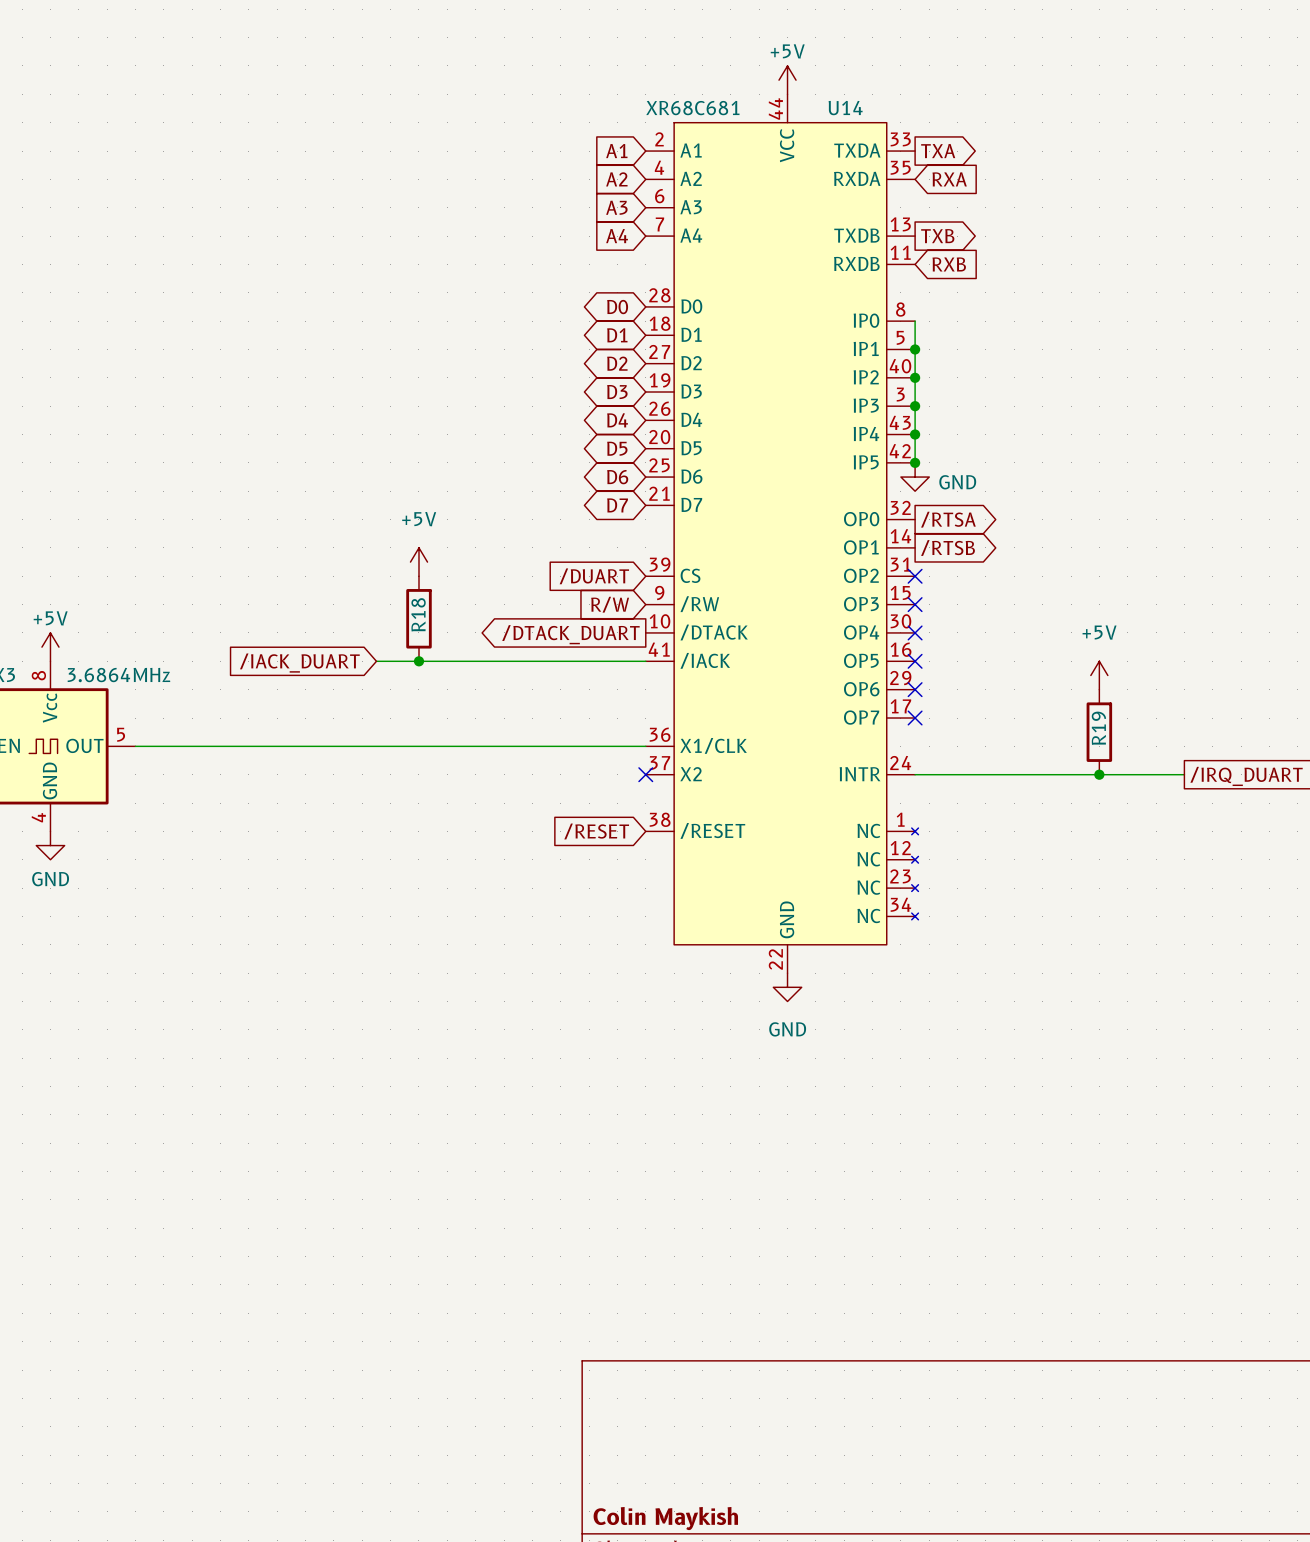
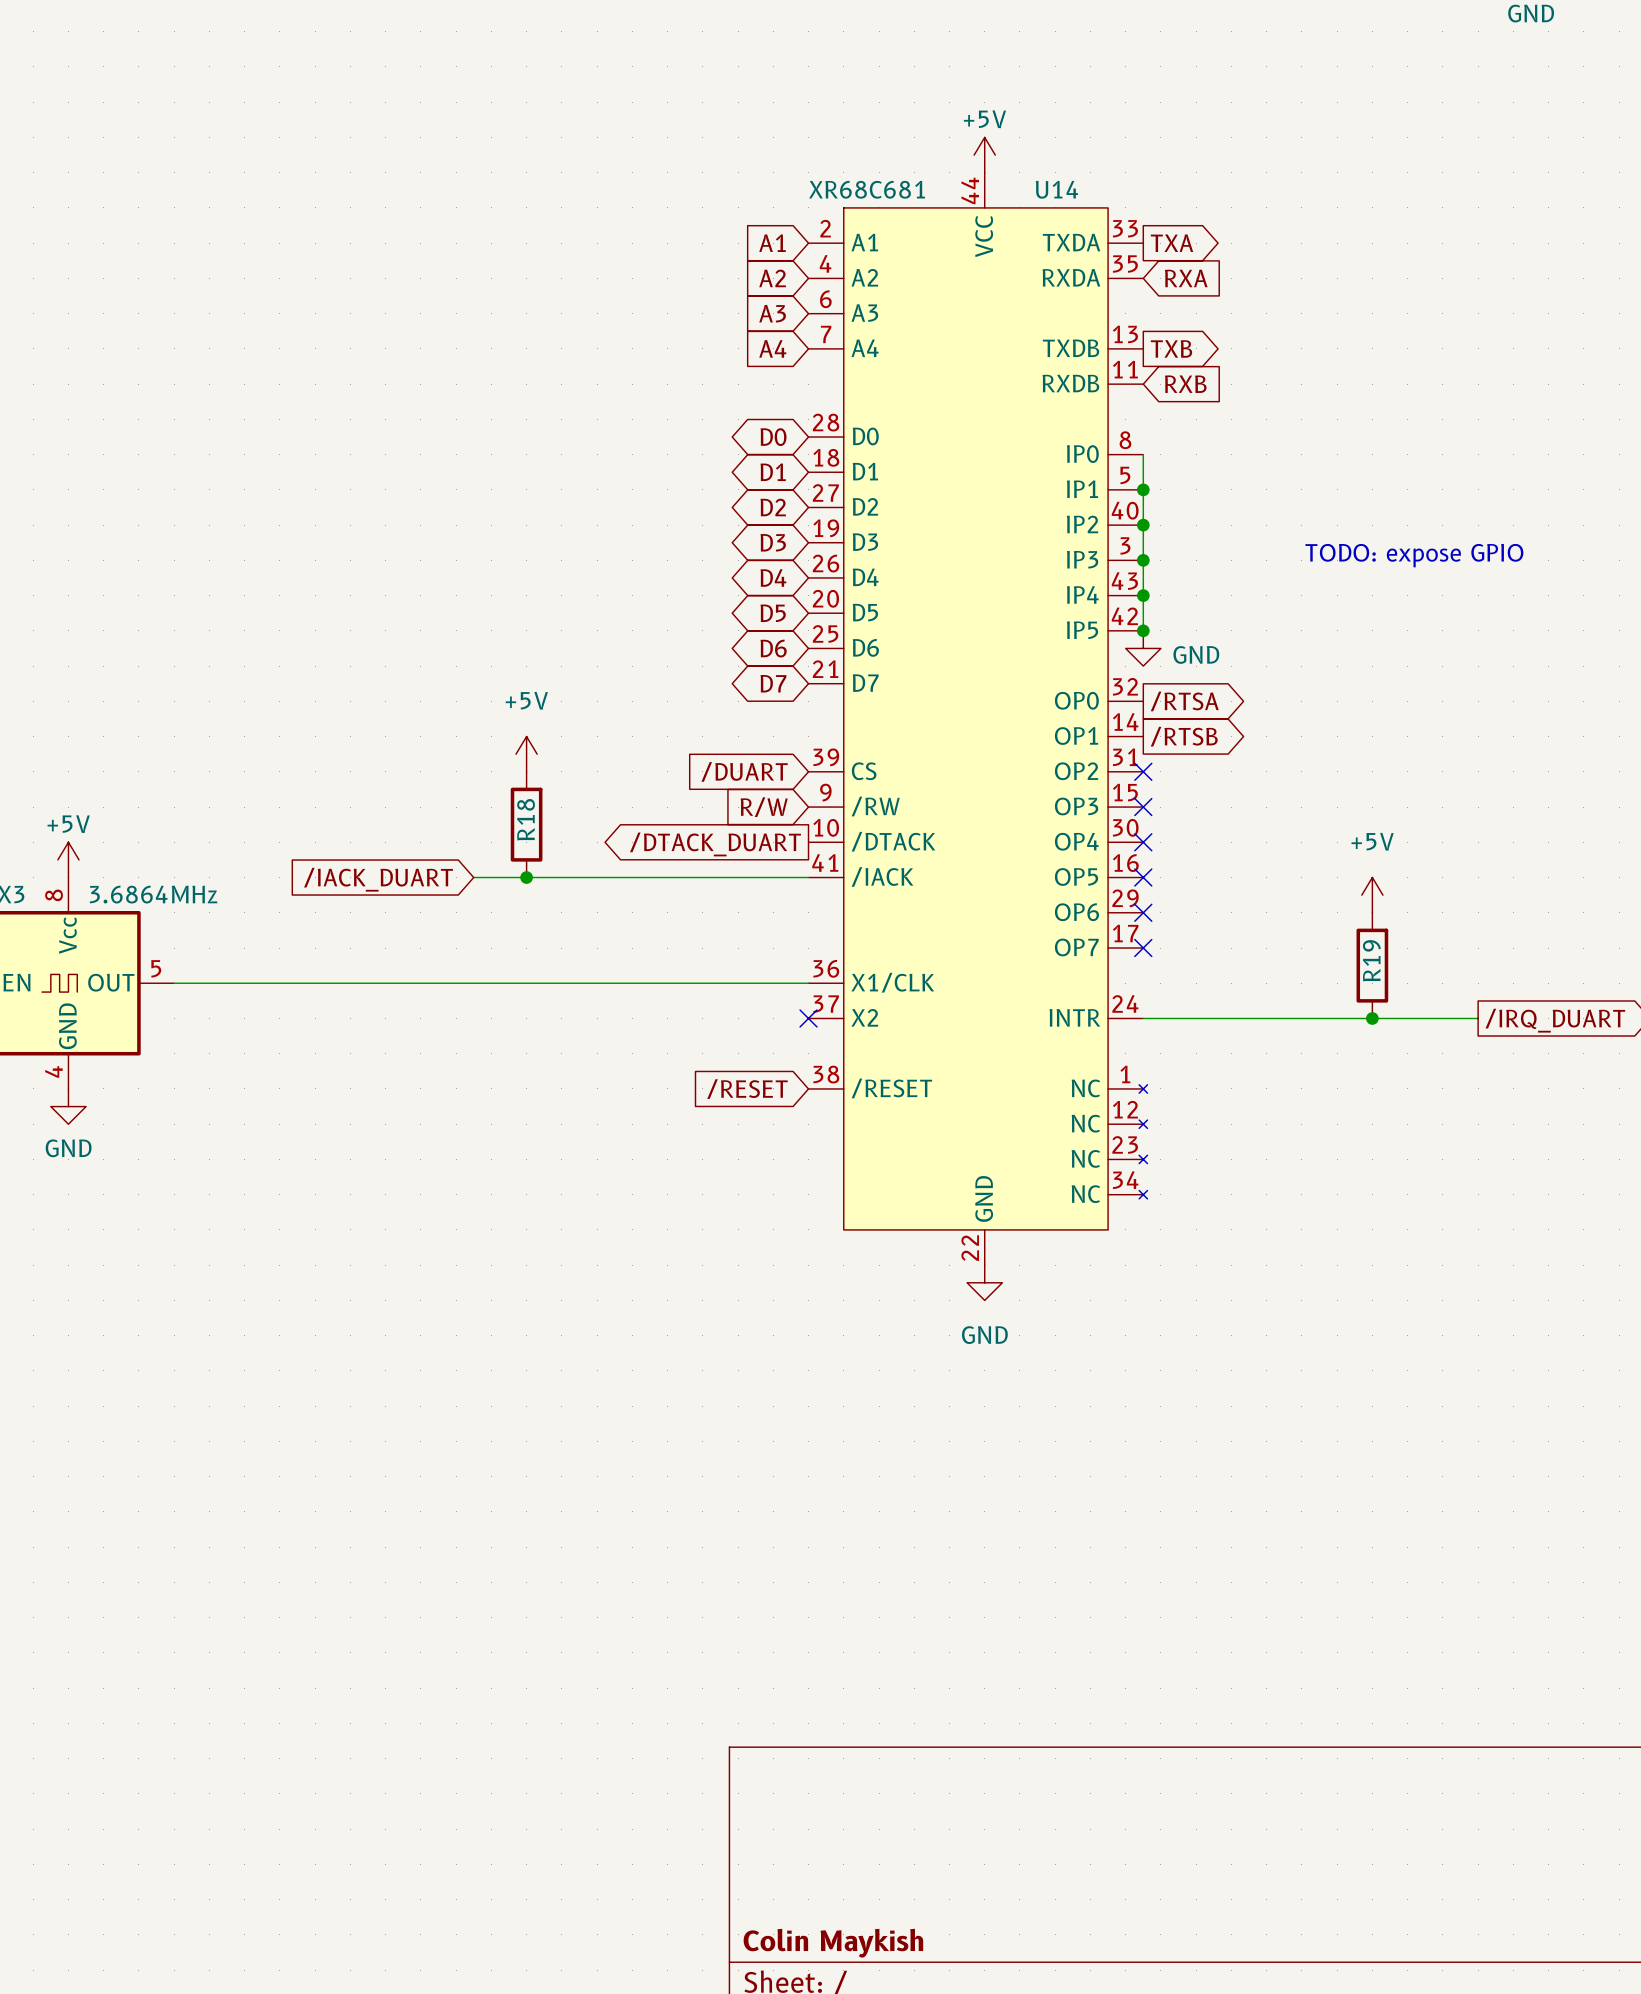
text: none -> TODO: expose GPIO (1414, 555)

